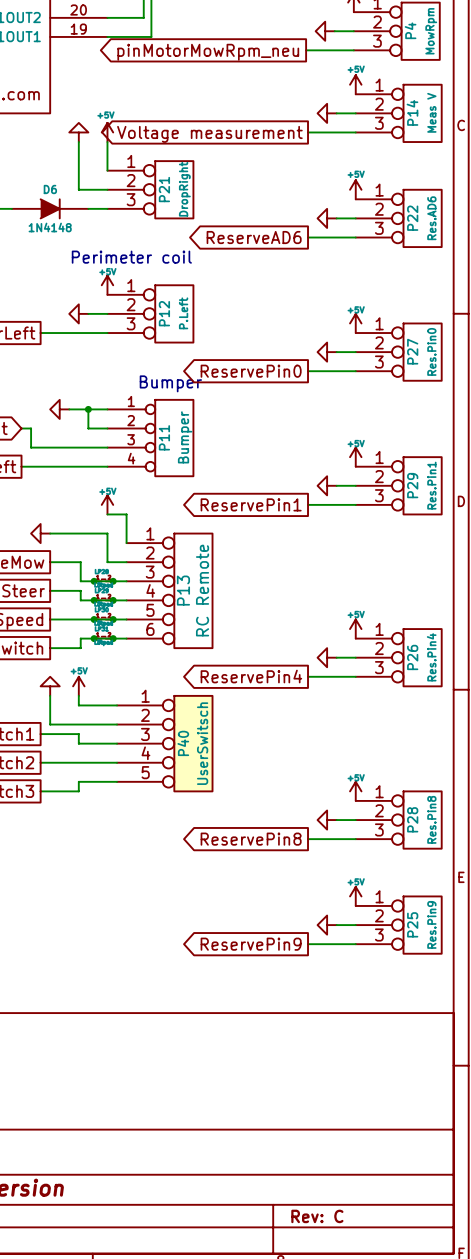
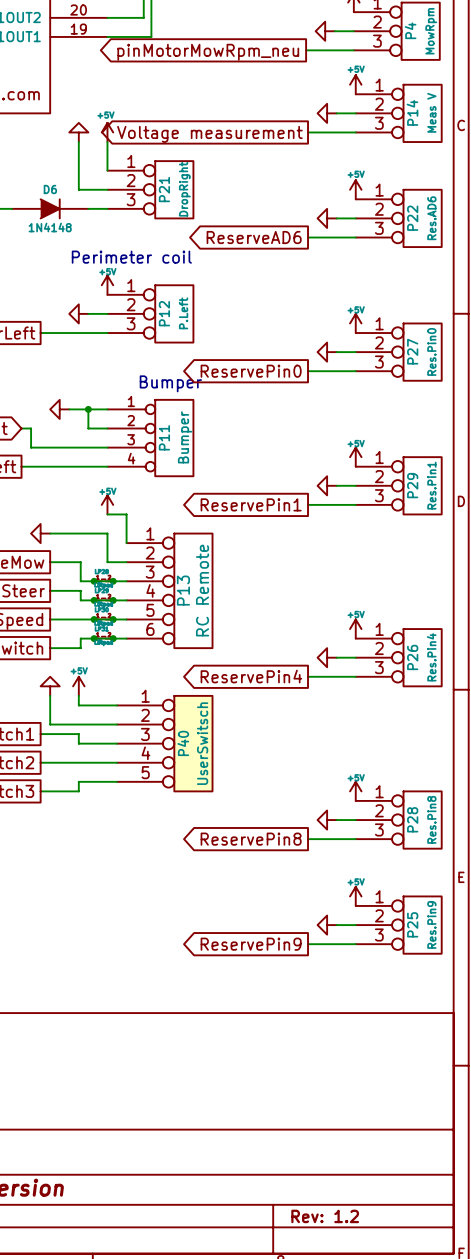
title block: Rev: C (317, 1216) -> Rev: 1.2 (325, 1216)

